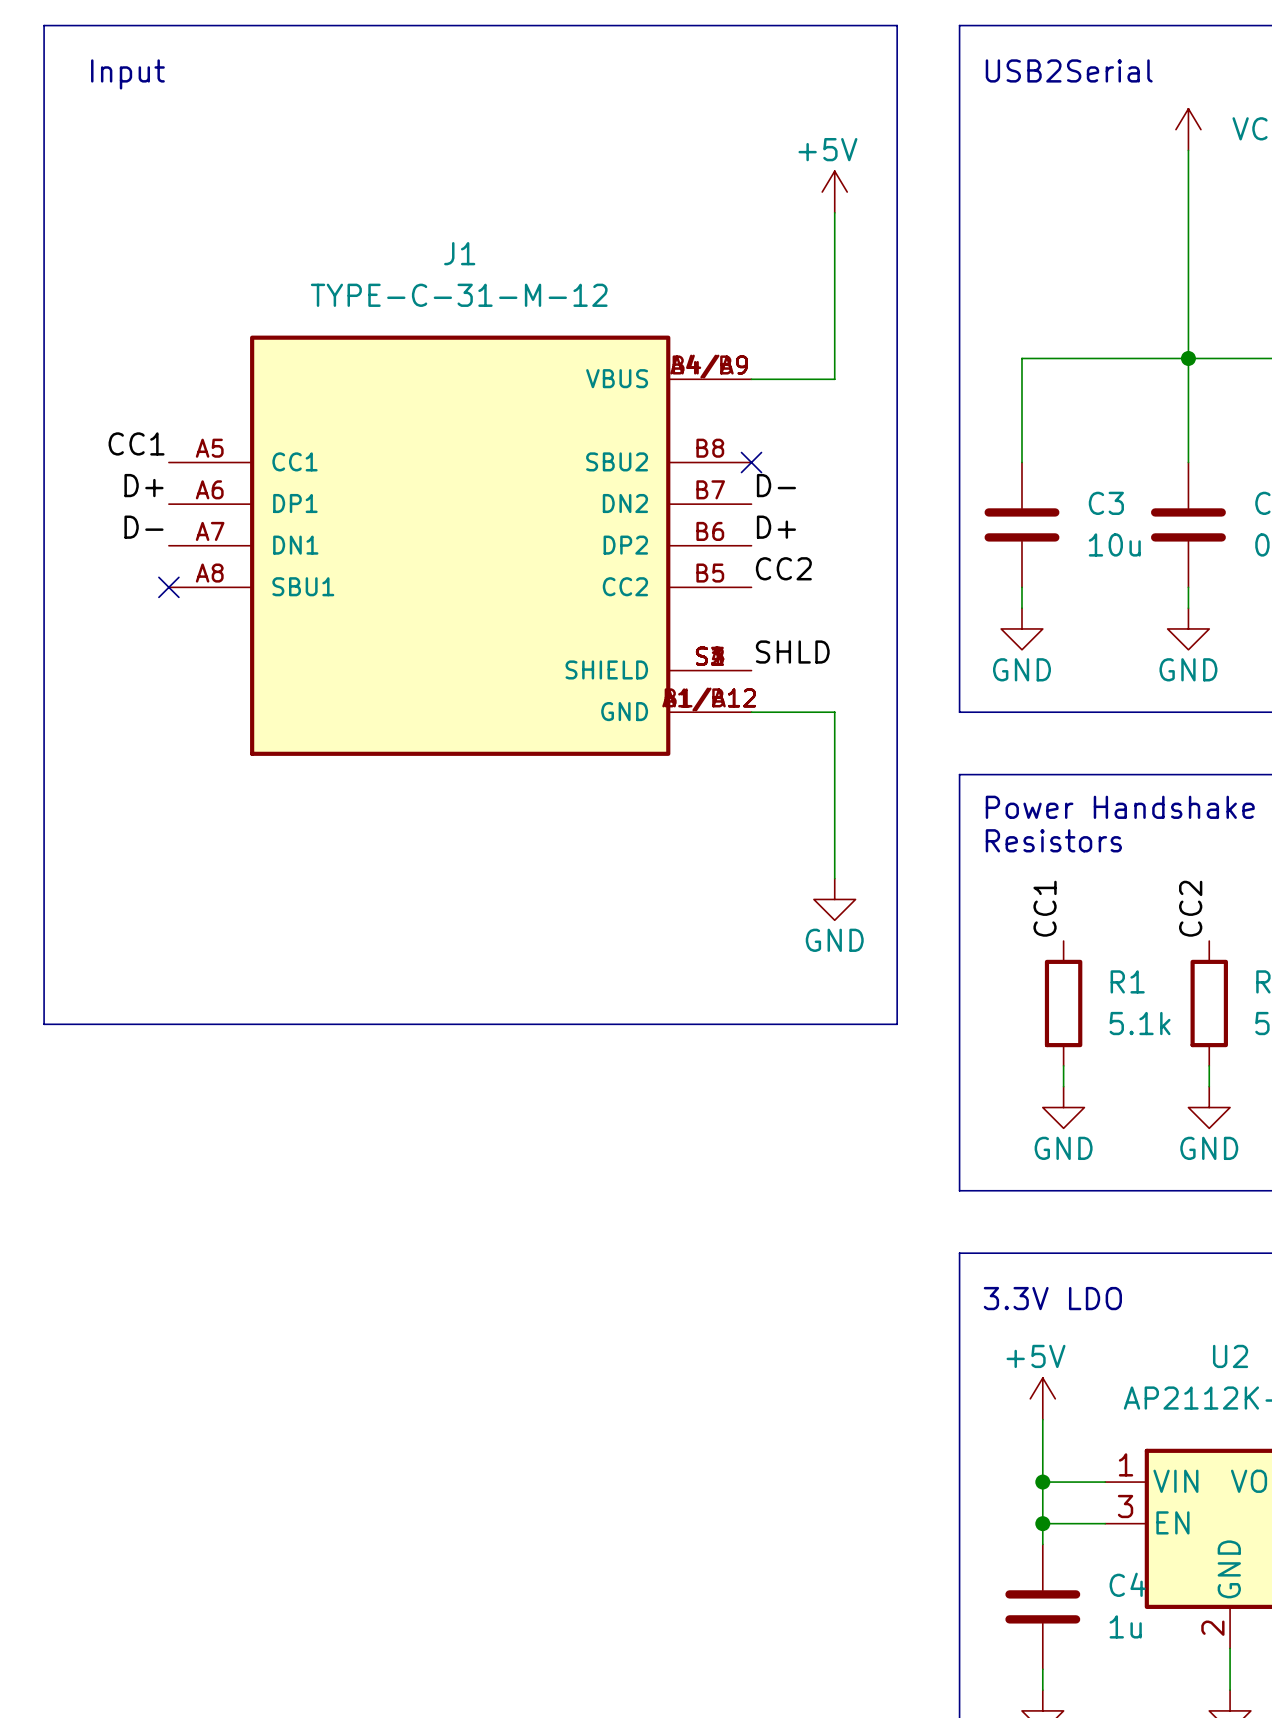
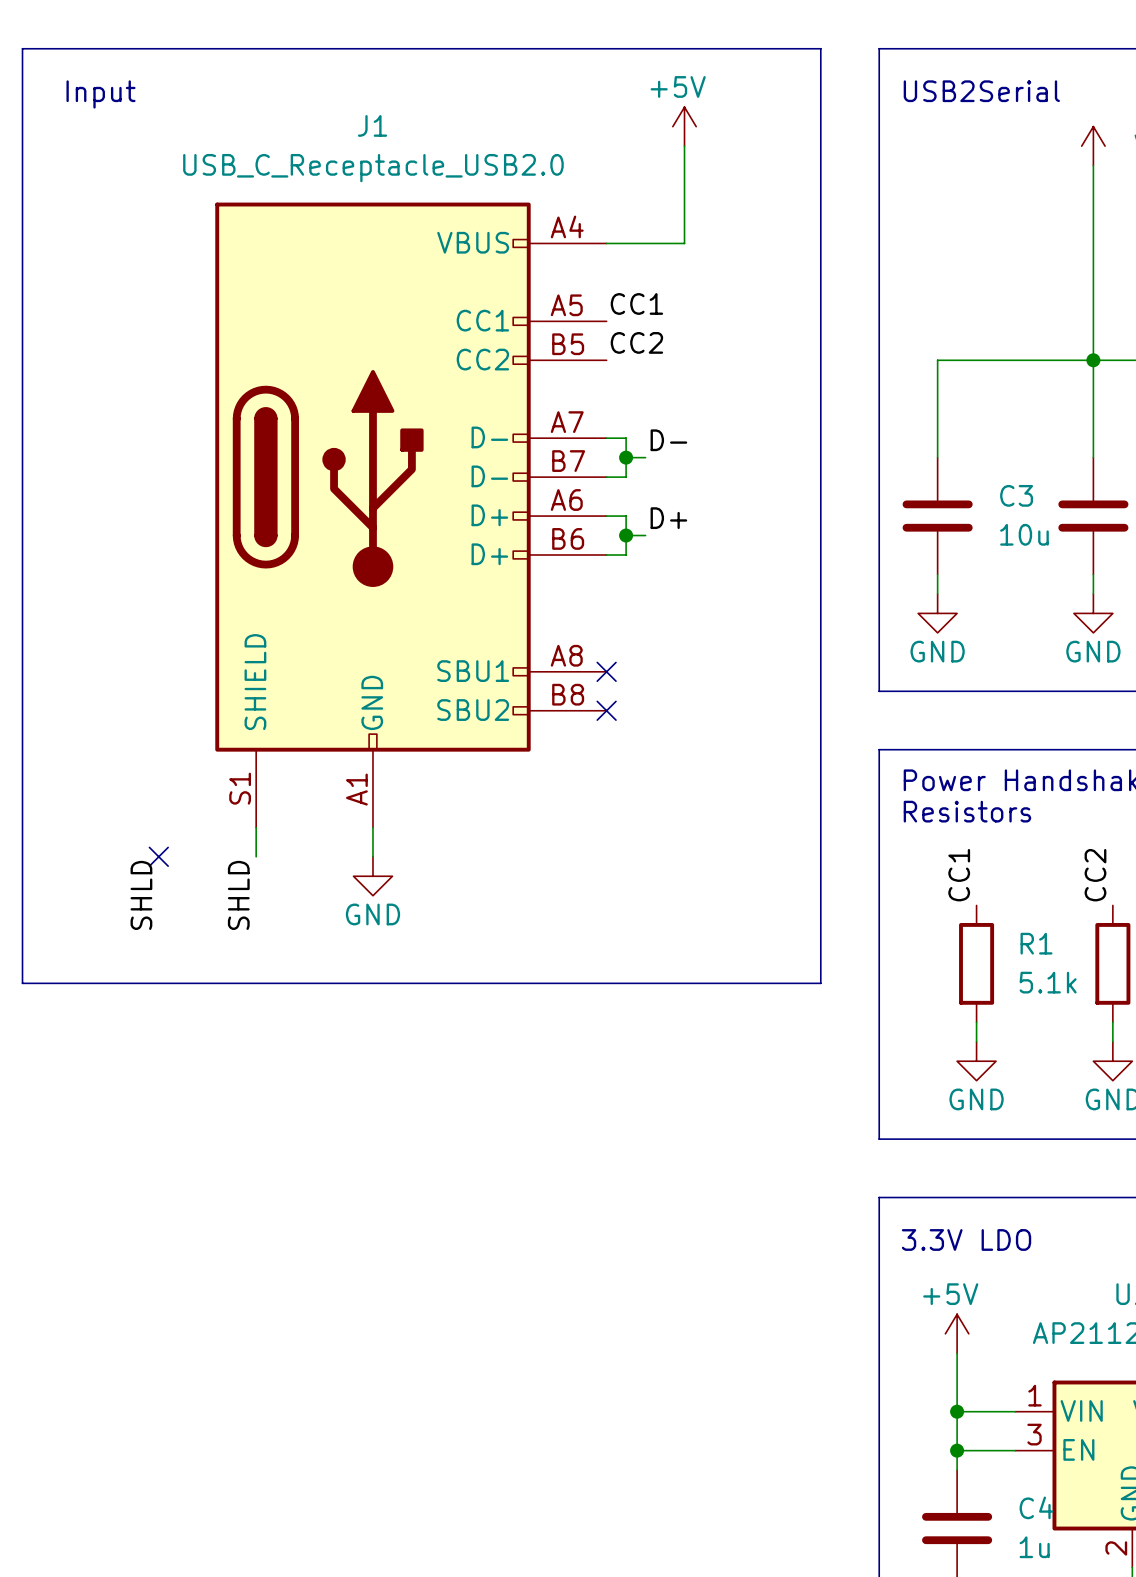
wire: none -> (684, 146) (684, 243) (606, 243)
power symbol position: +5V (834, 192) -> +5V (684, 126)
wire: (834, 212) (834, 379) (751, 379) -> none
J1 name position: J1 (459, 253) -> J1 (372, 125)
J1 value: TYPE-C-31-M-12 (459, 295) -> USB_C_Receptacle_USB2.0 (373, 168)
label: none -> CC1 (636, 303)
J1 symbol: [168, 335, 752, 756] -> [215, 202, 607, 828]
wire: none -> (606, 438) (626, 438) (626, 477) (606, 477)
label: CC1 (136, 443) -> none
junction: none -> (626, 457)
no-connect mark: (751, 462) -> none
label: D+ (143, 485) -> none
label position: D- (776, 485) -> D- (668, 440)
wire: none -> (606, 516) (626, 516) (626, 555) (606, 555)
label: D- (143, 527) -> none
label position: D+ (776, 527) -> D+ (668, 518)
junction: none -> (626, 535)
label position: CC2 (783, 568) -> CC2 (636, 342)
no-connect mark: (168, 587) -> none
label: SHLD (792, 652) -> none
no-connect mark: none -> (606, 671)
wire: (751, 712) (834, 712) (834, 878) -> none
no-connect mark: none -> (606, 710)
wire: none -> (256, 827) (256, 856)
wire: none -> (372, 827) (372, 856)
no-connect mark: none -> (158, 856)
power symbol: GND (834, 899) -> none
power symbol: none -> GND (372, 876)
label: none -> SHLD (141, 895)
label: none -> SHLD (238, 895)

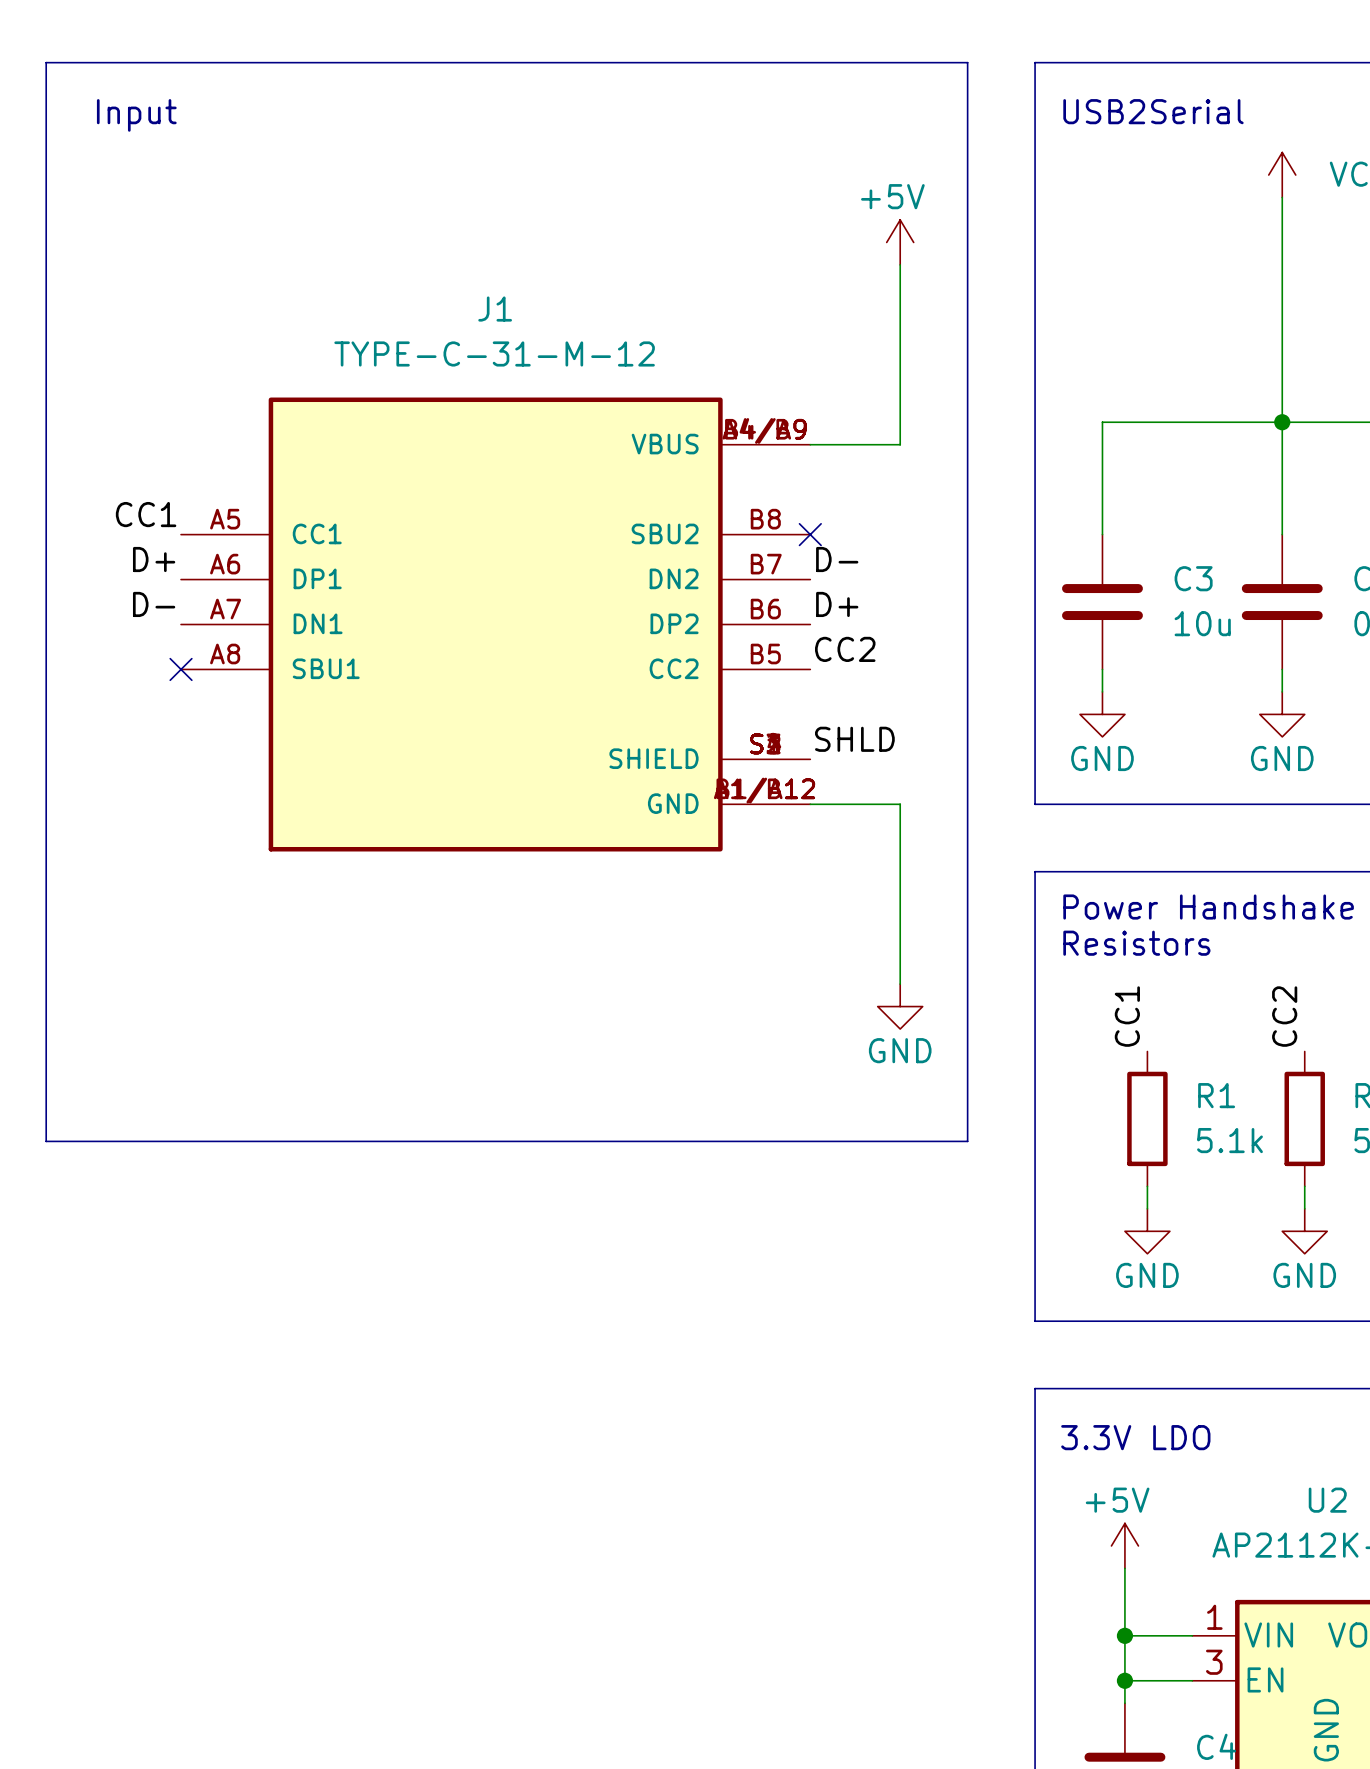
J1 name position: J1 (372, 125) -> J1 (495, 309)
power symbol position: +5V (684, 126) -> +5V (900, 242)
wire: (684, 146) (684, 243) (606, 243) -> none
J1 value: USB_C_Receptacle_USB2.0 (373, 168) -> TYPE-C-31-M-12 (494, 353)
J1 symbol: [215, 202, 607, 828] -> [181, 397, 811, 852]
wire: none -> (900, 264) (900, 444) (810, 444)
label: CC1 (636, 303) -> none
label position: CC2 (636, 342) -> CC2 (845, 649)
wire: (606, 438) (626, 438) (626, 477) (606, 477) -> none
label: none -> CC1 (146, 514)
label position: D- (668, 440) -> D- (837, 559)
junction: (626, 457) -> none
no-connect mark: none -> (810, 534)
label: none -> D+ (154, 559)
wire: (606, 516) (626, 516) (626, 555) (606, 555) -> none
label: none -> D- (154, 604)
label position: D+ (668, 518) -> D+ (837, 604)
junction: (626, 535) -> none
no-connect mark: none -> (181, 669)
label: none -> SHLD (854, 739)
no-connect mark: (606, 671) -> none
wire: none -> (810, 804) (900, 804) (900, 984)
no-connect mark: (606, 710) -> none
wire: (256, 827) (256, 856) -> none
wire: (372, 827) (372, 856) -> none
no-connect mark: (158, 856) -> none
power symbol: none -> GND (900, 1006)
power symbol: GND (372, 876) -> none
label: SHLD (141, 895) -> none
label: SHLD (238, 895) -> none

